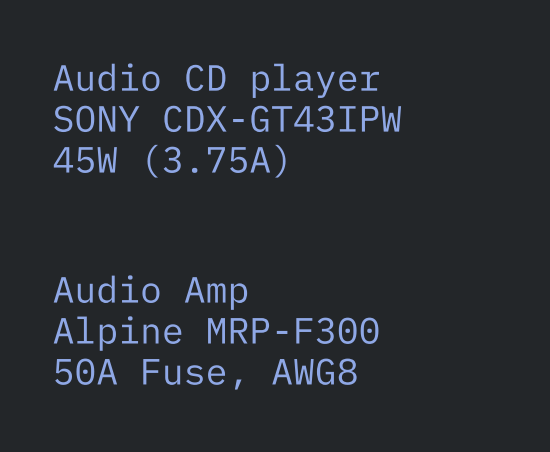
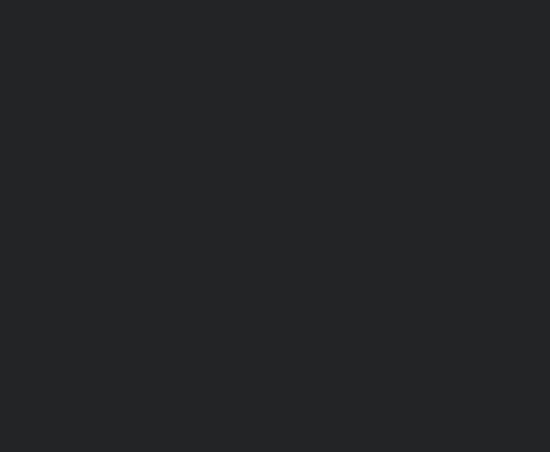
text: Audio CD player (216, 80) -> none
text: SONY CDX-GT43IPW (227, 118) -> none
text: 45W (3.75A) (169, 161) -> none
text: Audio Amp (150, 292) -> none
text: Alpine MRP-F300 (216, 333) -> none
text: 50A Fuse, AWG8 (205, 374) -> none

